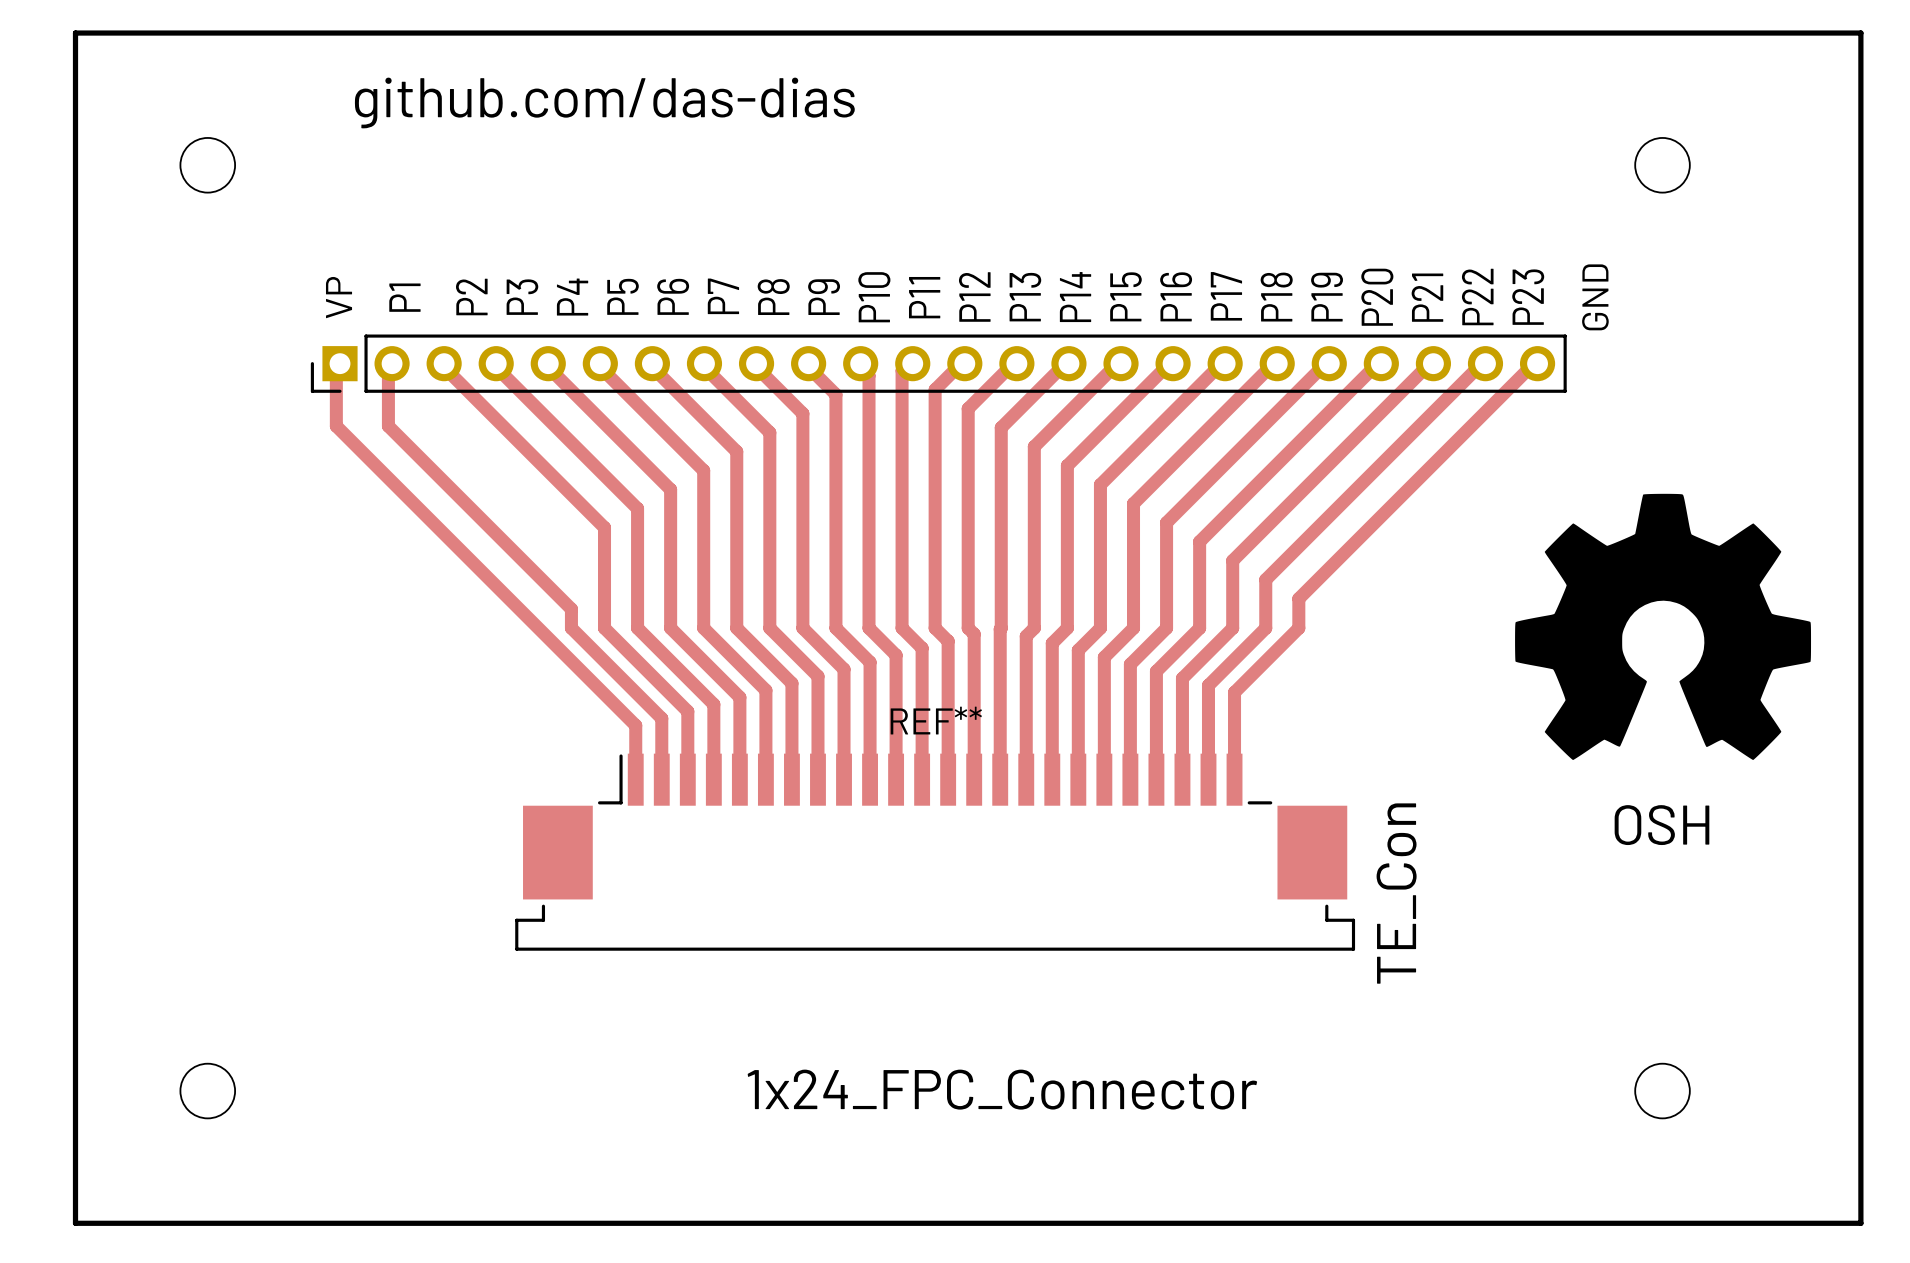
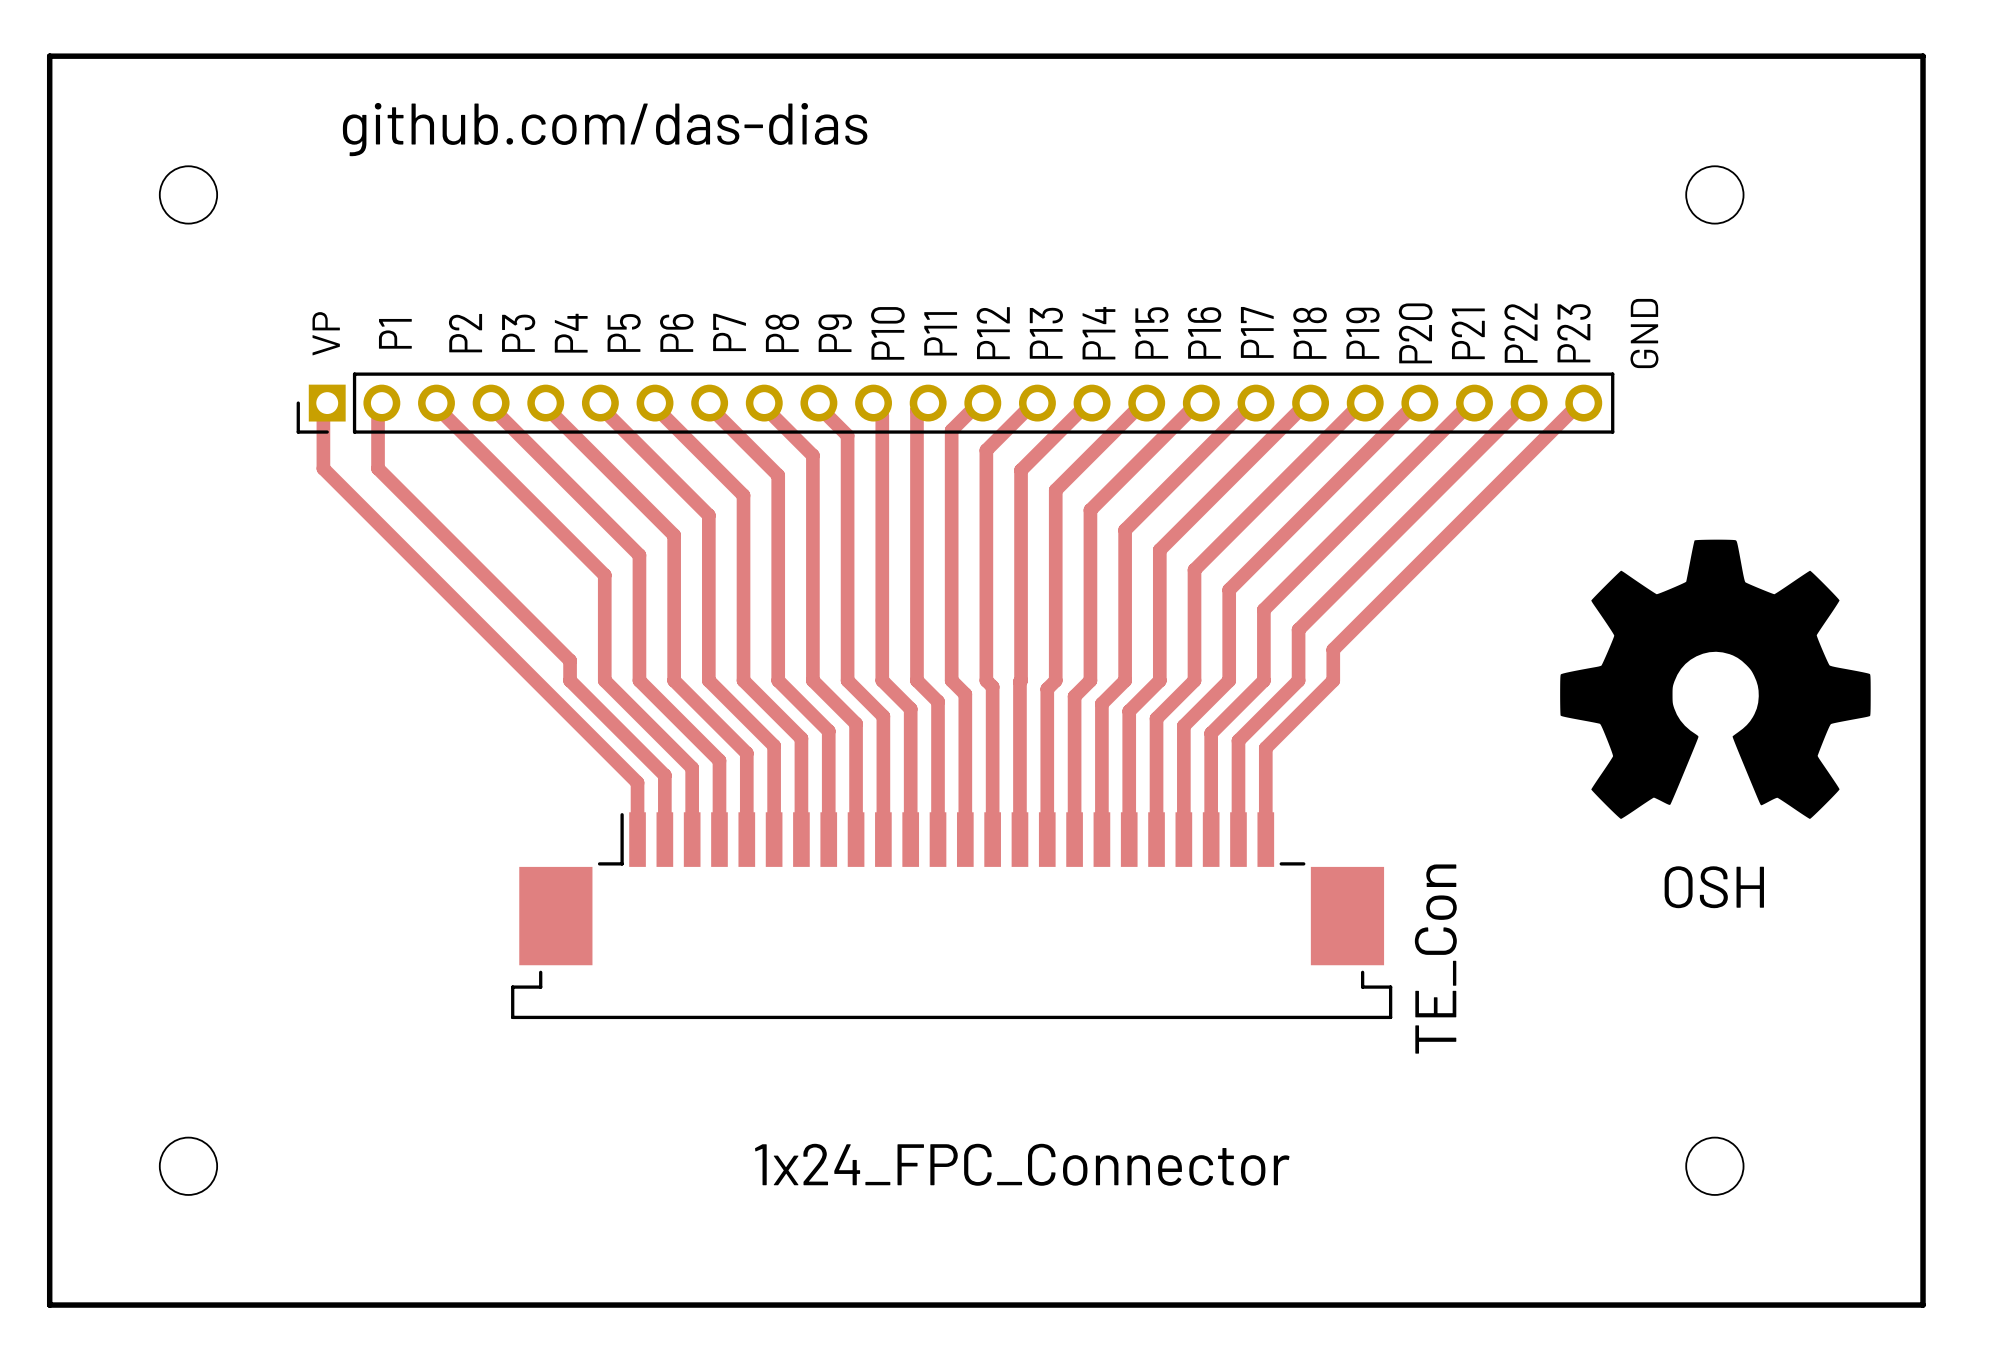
REF** name: REF** (936, 720) -> none

